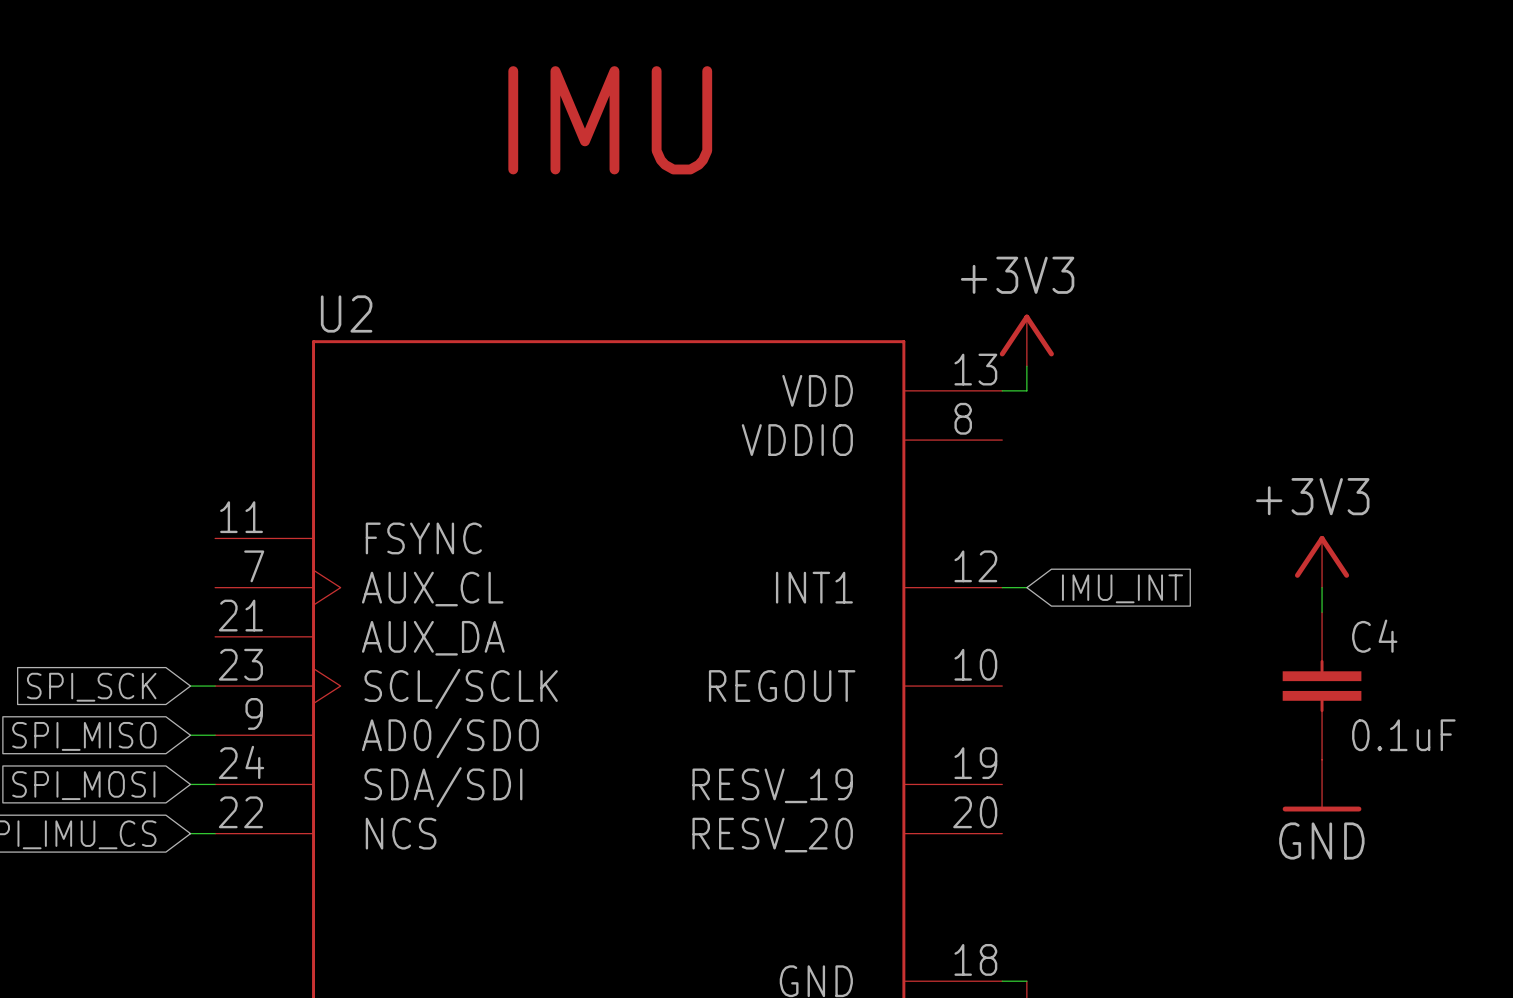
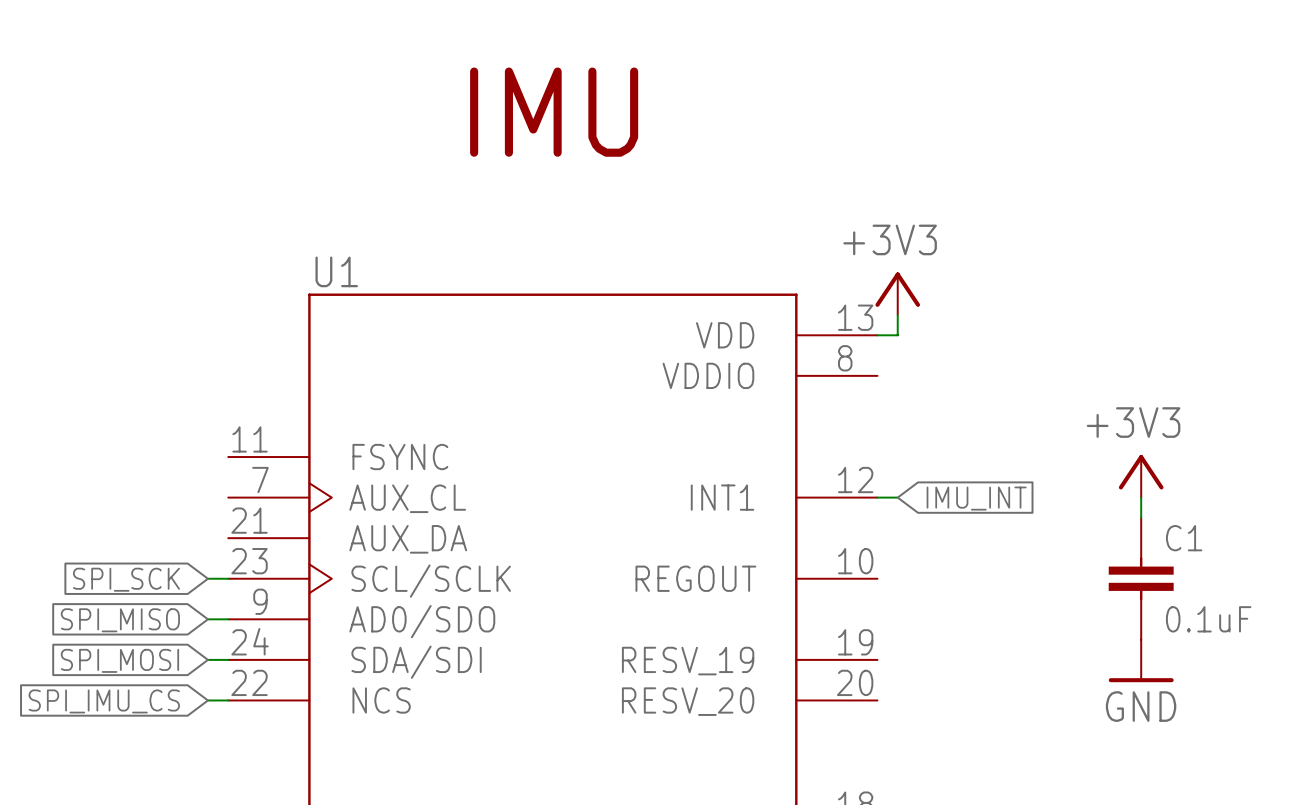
U2 name: U2 (346, 313) -> U1 (336, 271)
C4 name: C4 (1374, 636) -> C1 (1184, 538)

